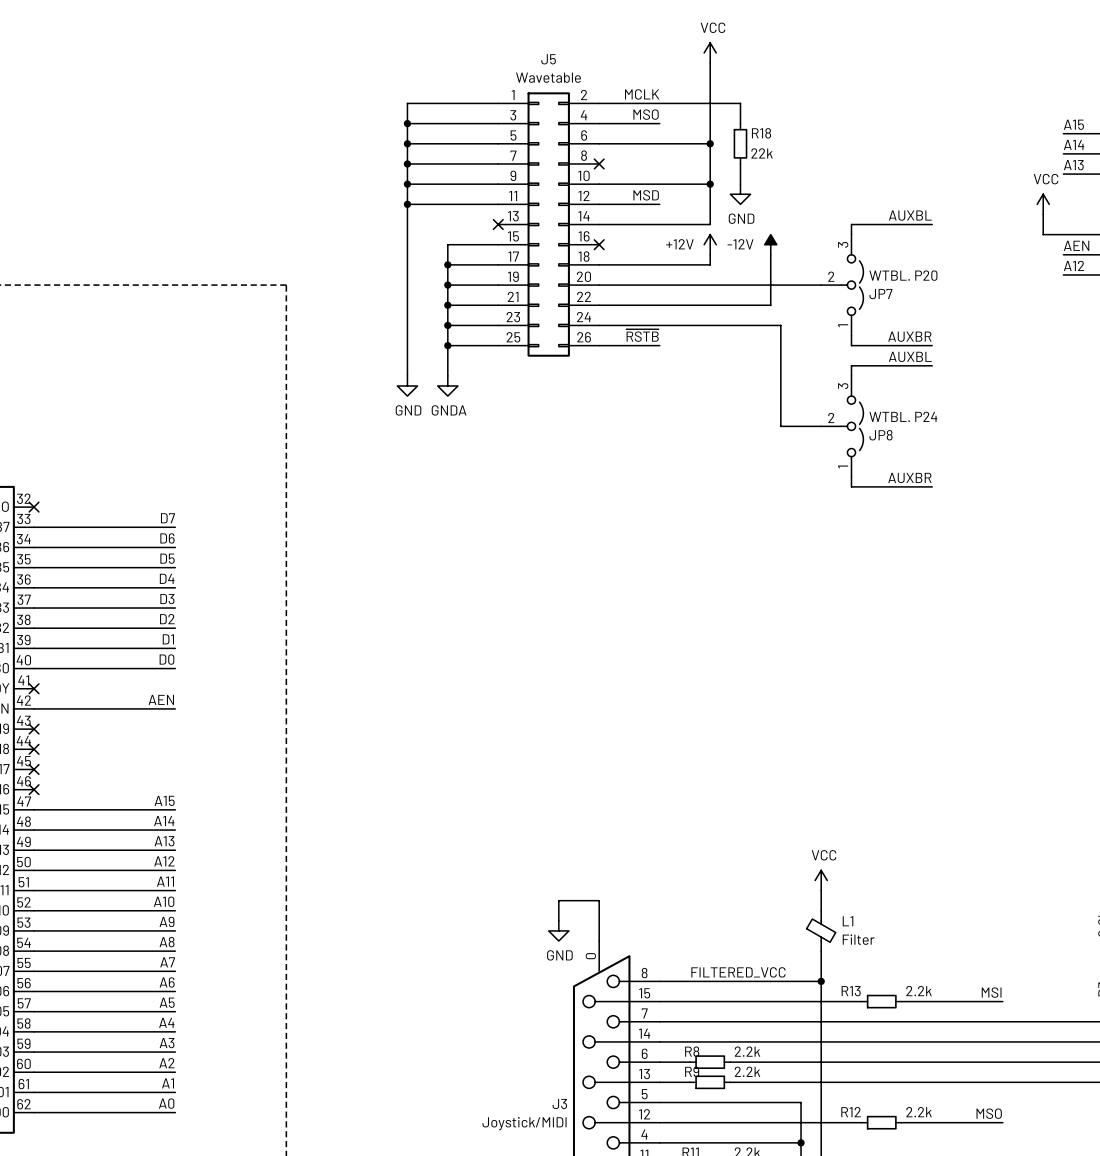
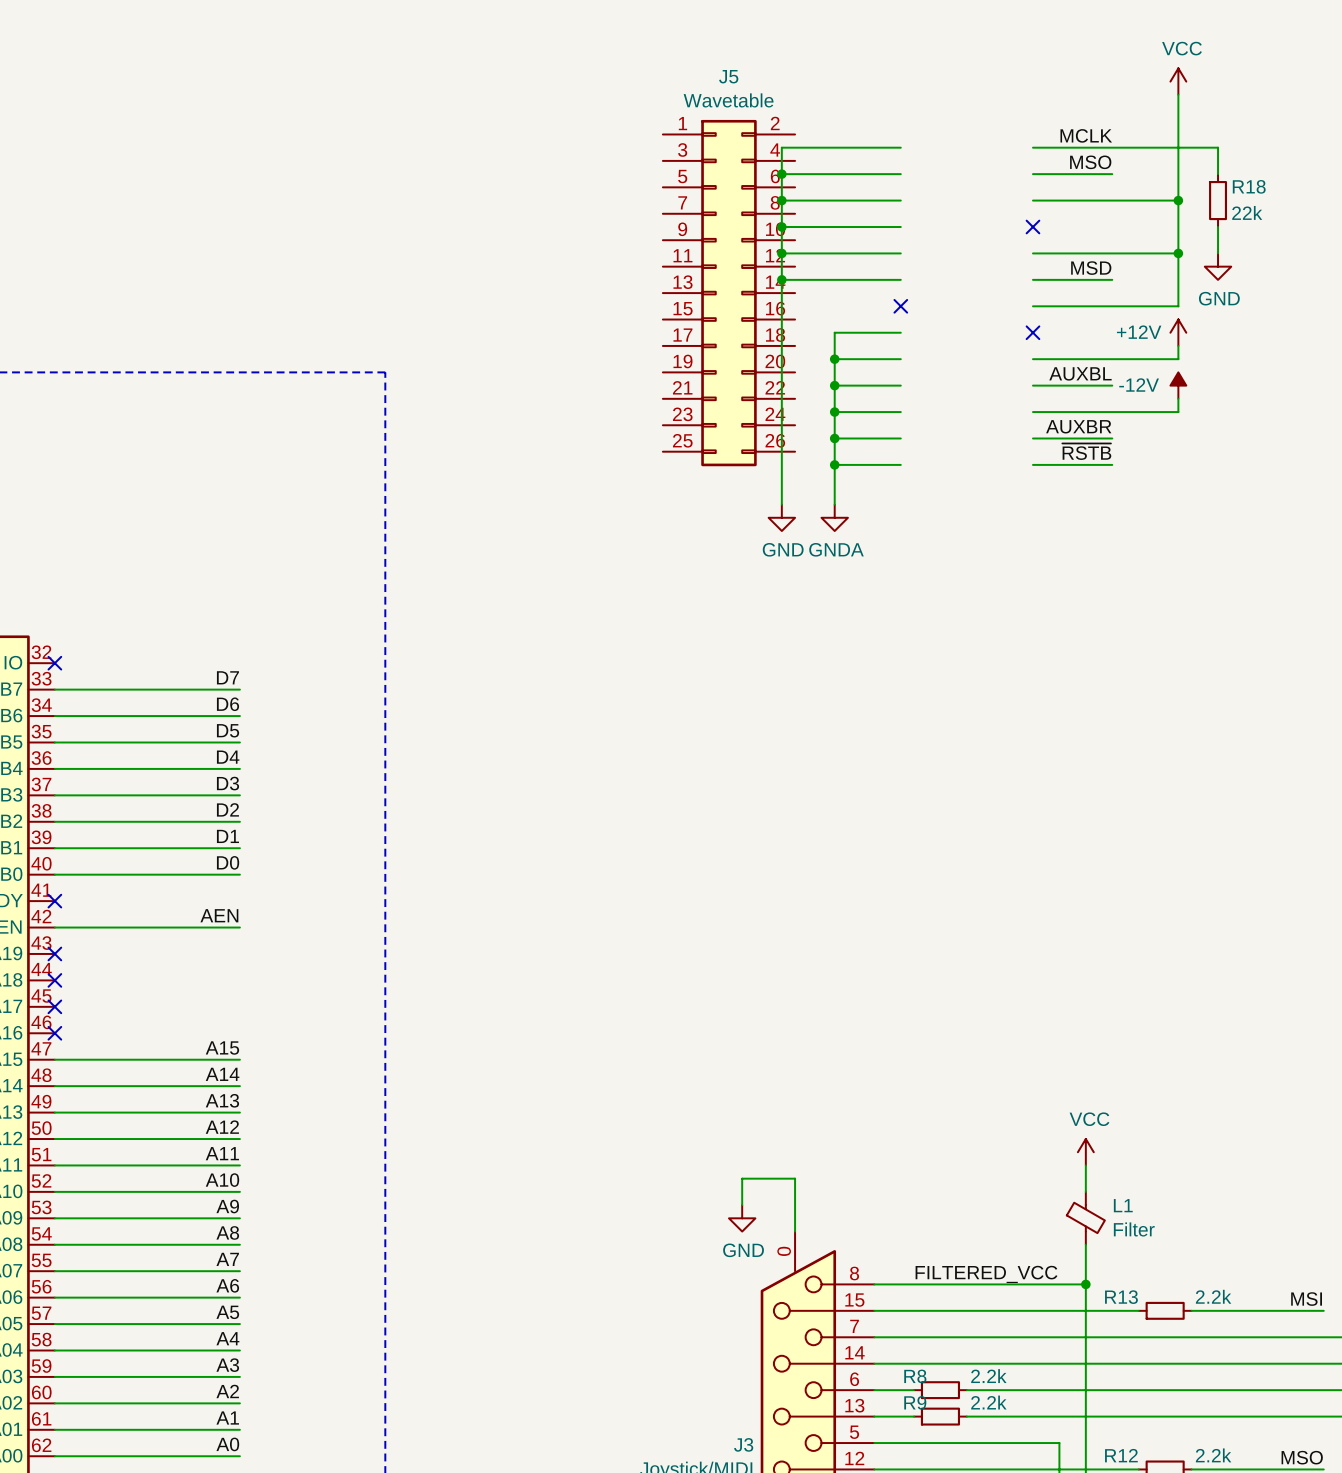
power symbol position: VCC (710, 52) -> VCC (1178, 81)
wire: (710, 63) (710, 224) (599, 224) -> (1178, 94) (1178, 306) (1032, 306)
label position: MCLK (642, 94) -> MCLK (1086, 135)
wire: (498, 103) (407, 103) (407, 375) -> (900, 147) (781, 147) (781, 504)
wire: (599, 103) (740, 103) (740, 123) -> (1032, 147) (1218, 147) (1218, 174)
label position: MSO (646, 114) -> MSO (1090, 162)
wire: (407, 123) (498, 123) -> (781, 174) (900, 174)
junction: (407, 123) -> none
wire: (599, 123) (659, 123) -> (1032, 174) (1112, 174)
junction: none -> (781, 174)
wire: (407, 143) (498, 143) -> (781, 200) (900, 200)
junction: (407, 143) -> none
wire: (599, 143) (710, 143) -> (1032, 200) (1178, 200)
junction: (710, 143) -> none
R18 position: (740, 143) -> (1218, 200)
junction: none -> (781, 200)
junction: none -> (1178, 200)
wire: (407, 163) (498, 163) -> (781, 227) (900, 227)
junction: (407, 163) -> none
no-connect mark: (599, 163) -> none
wire: (740, 163) (740, 184) -> (1218, 227) (1218, 253)
junction: none -> (781, 227)
no-connect mark: none -> (1032, 227)
wire: (407, 184) (498, 184) -> (781, 253) (900, 253)
junction: (407, 184) -> none
wire: (599, 184) (710, 184) -> (1032, 253) (1178, 253)
junction: (710, 184) -> none
junction: none -> (781, 253)
power symbol: GND (740, 194) -> none
junction: none -> (1178, 253)
label position: MSD (646, 195) -> MSD (1091, 268)
wire: (407, 204) (498, 204) -> (781, 279) (900, 279)
junction: (407, 204) -> none
wire: (599, 204) (659, 204) -> (1032, 279) (1112, 279)
power symbol: none -> GND (1218, 266)
junction: none -> (781, 279)
label: AUXBL (910, 215) -> none
no-connect mark: (498, 224) -> none
wire: (932, 224) (851, 224) (851, 234) -> none
no-connect mark: none -> (900, 306)
wire: (498, 244) (447, 244) (447, 375) -> (900, 332) (834, 332) (834, 504)
no-connect mark: (599, 244) -> none
power symbol position: +12V (710, 244) -> +12V (1178, 332)
power symbol position: -12V (770, 244) -> -12V (1178, 385)
wire: (710, 254) (710, 264) (599, 264) -> (1178, 345) (1178, 359) (1032, 359)
wire: (770, 254) (770, 305) (599, 305) -> none
no-connect mark: none -> (1032, 332)
wire: (447, 264) (498, 264) -> (834, 359) (900, 359)
junction: (447, 264) -> none
junction: none -> (834, 359)
wire: (447, 285) (498, 285) -> (834, 385) (900, 385)
junction: (447, 285) -> none
wire: (599, 285) (821, 285) -> none
JP7: WTBL. P20 (842, 285) -> none
label: none -> AUXBL (1080, 373)
junction: none -> (834, 385)
wire: none -> (1032, 385) (1112, 385)
wire: (447, 305) (498, 305) -> (834, 412) (900, 412)
junction: (447, 305) -> none
wire: none -> (1178, 398) (1178, 412) (1032, 412)
junction: none -> (834, 412)
wire: (447, 325) (498, 325) -> (834, 438) (900, 438)
junction: (447, 325) -> none
wire: (599, 325) (780, 325) (780, 426) (821, 426) -> none
label: none -> AUXBR (1078, 426)
junction: none -> (834, 438)
label position: ~{RSTB} (642, 335) -> ~{RSTB} (1086, 451)
wire: none -> (1032, 438) (1112, 438)
wire: (851, 335) (851, 345) (932, 345) -> none
label: AUXBR (909, 336) -> none
wire: (447, 345) (498, 345) -> (834, 464) (900, 464)
junction: (447, 345) -> none
wire: (599, 345) (659, 345) -> (1032, 464) (1112, 464)
junction: none -> (834, 464)
label: AUXBL (910, 356) -> none
wire: (932, 365) (851, 365) (851, 375) -> none
power symbol: GND (407, 385) -> none
power symbol position: GNDA (447, 385) -> GNDA (834, 517)
power symbol: none -> GND (781, 517)
JP8: WTBL. P24 (842, 426) -> none
wire: (851, 476) (851, 486) (932, 486) -> none
label: AUXBR (909, 477) -> none

